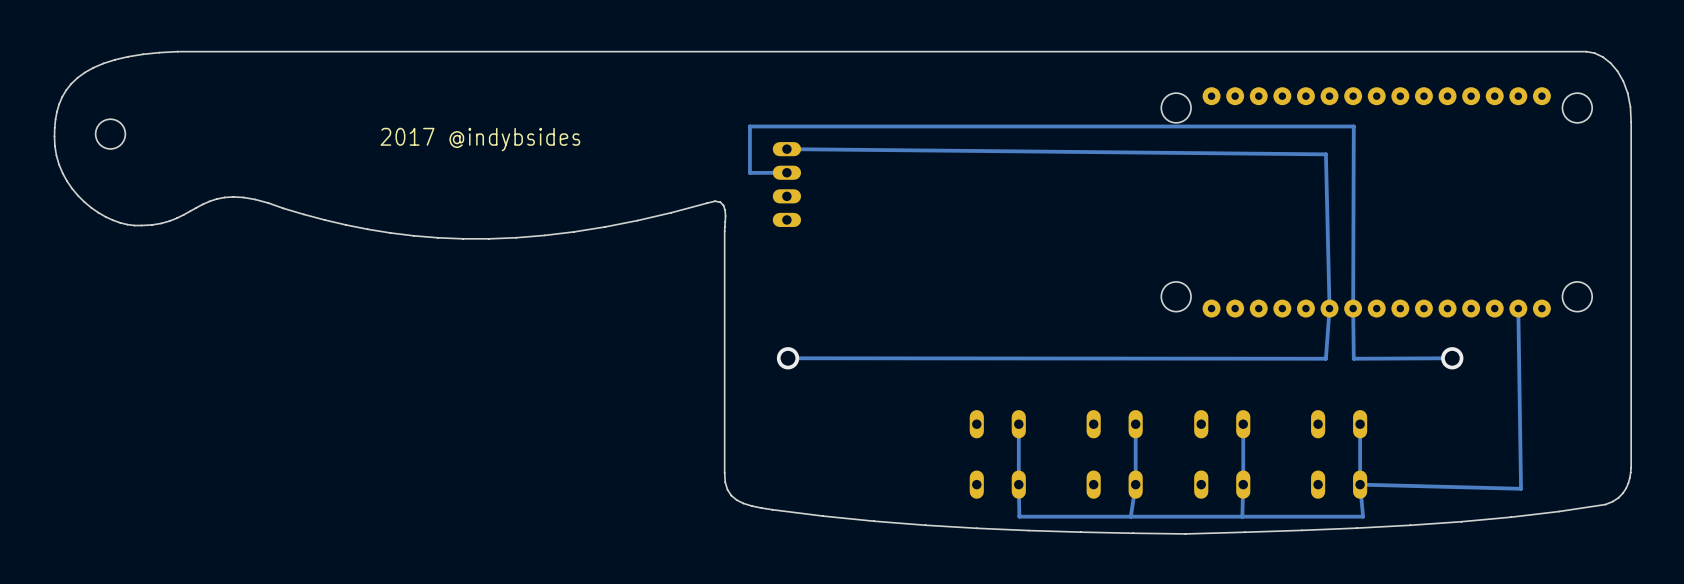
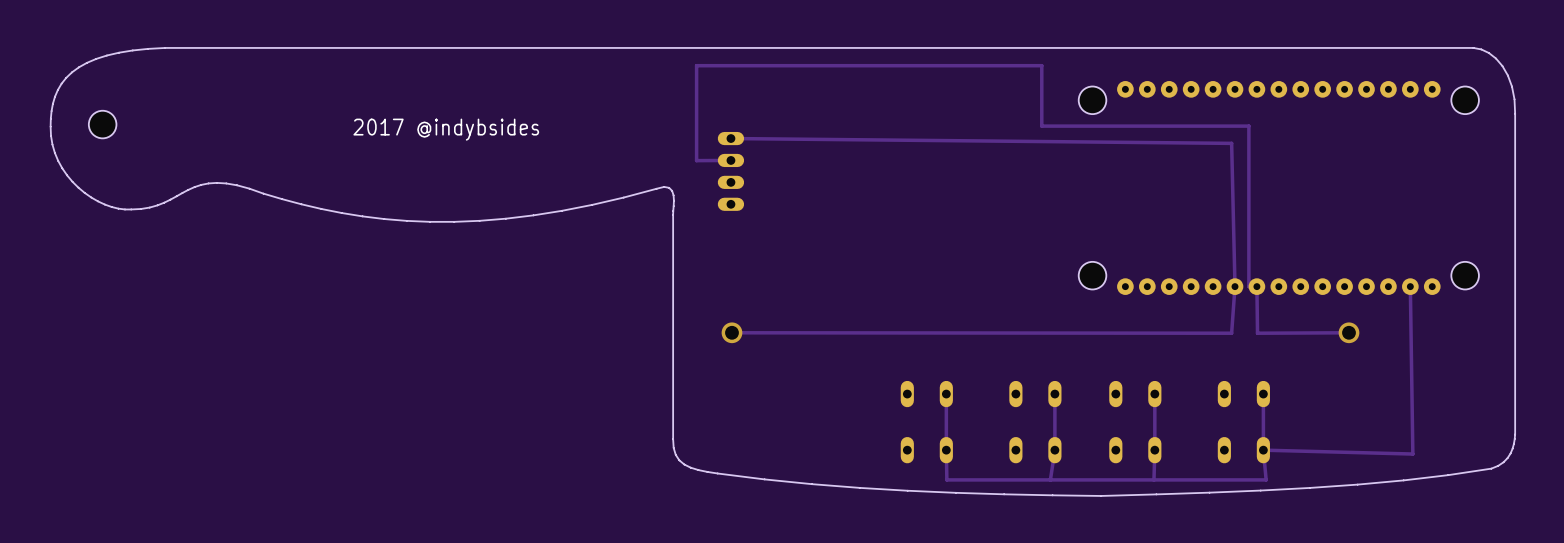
track: (749, 126) (1353, 126) (1353, 308) -> (696, 117) (696, 65) (1041, 65) (1041, 126) (1248, 126) (1248, 286) (1256, 286)

